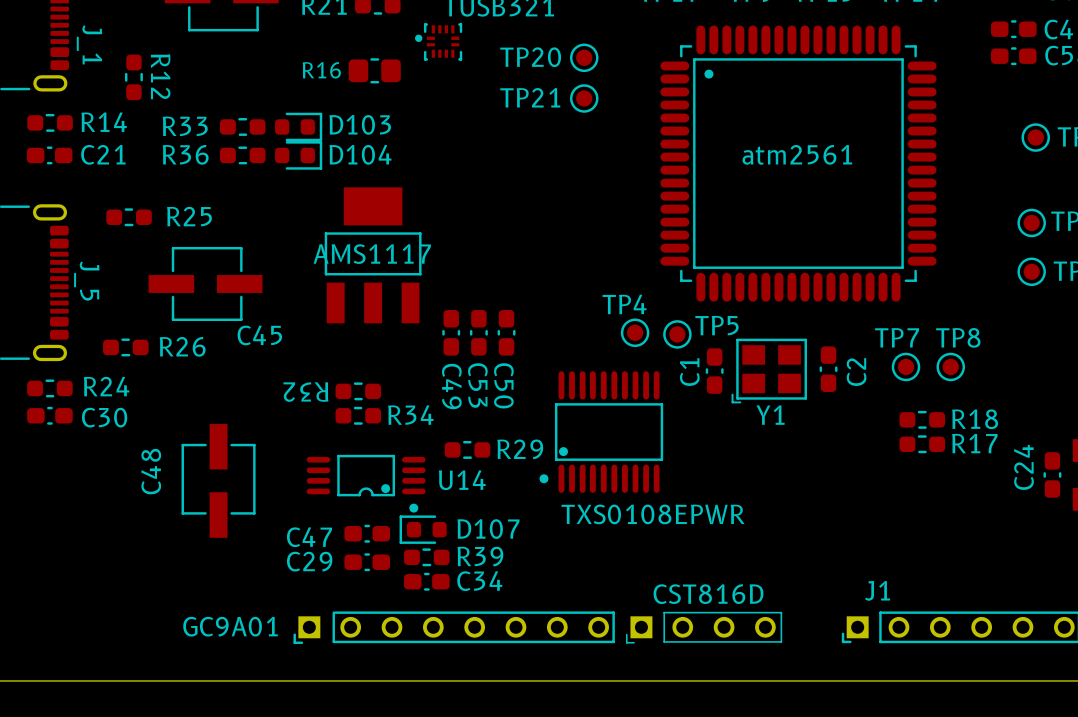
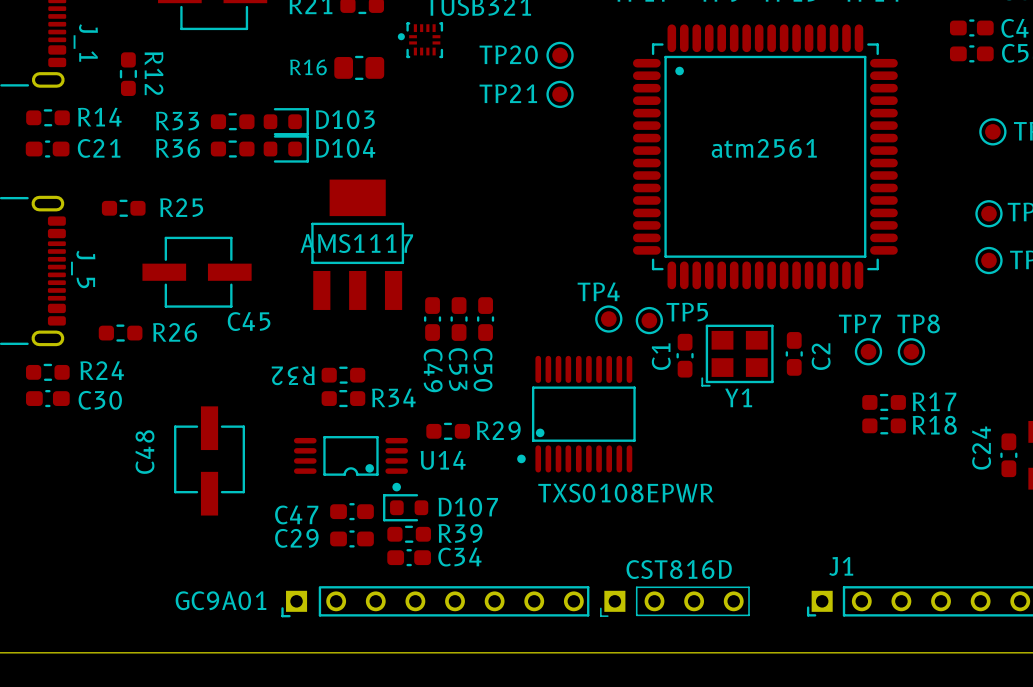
R18 name: R18 (975, 419) -> R17 (934, 401)
R17 name: R17 (974, 443) -> R18 (934, 425)

